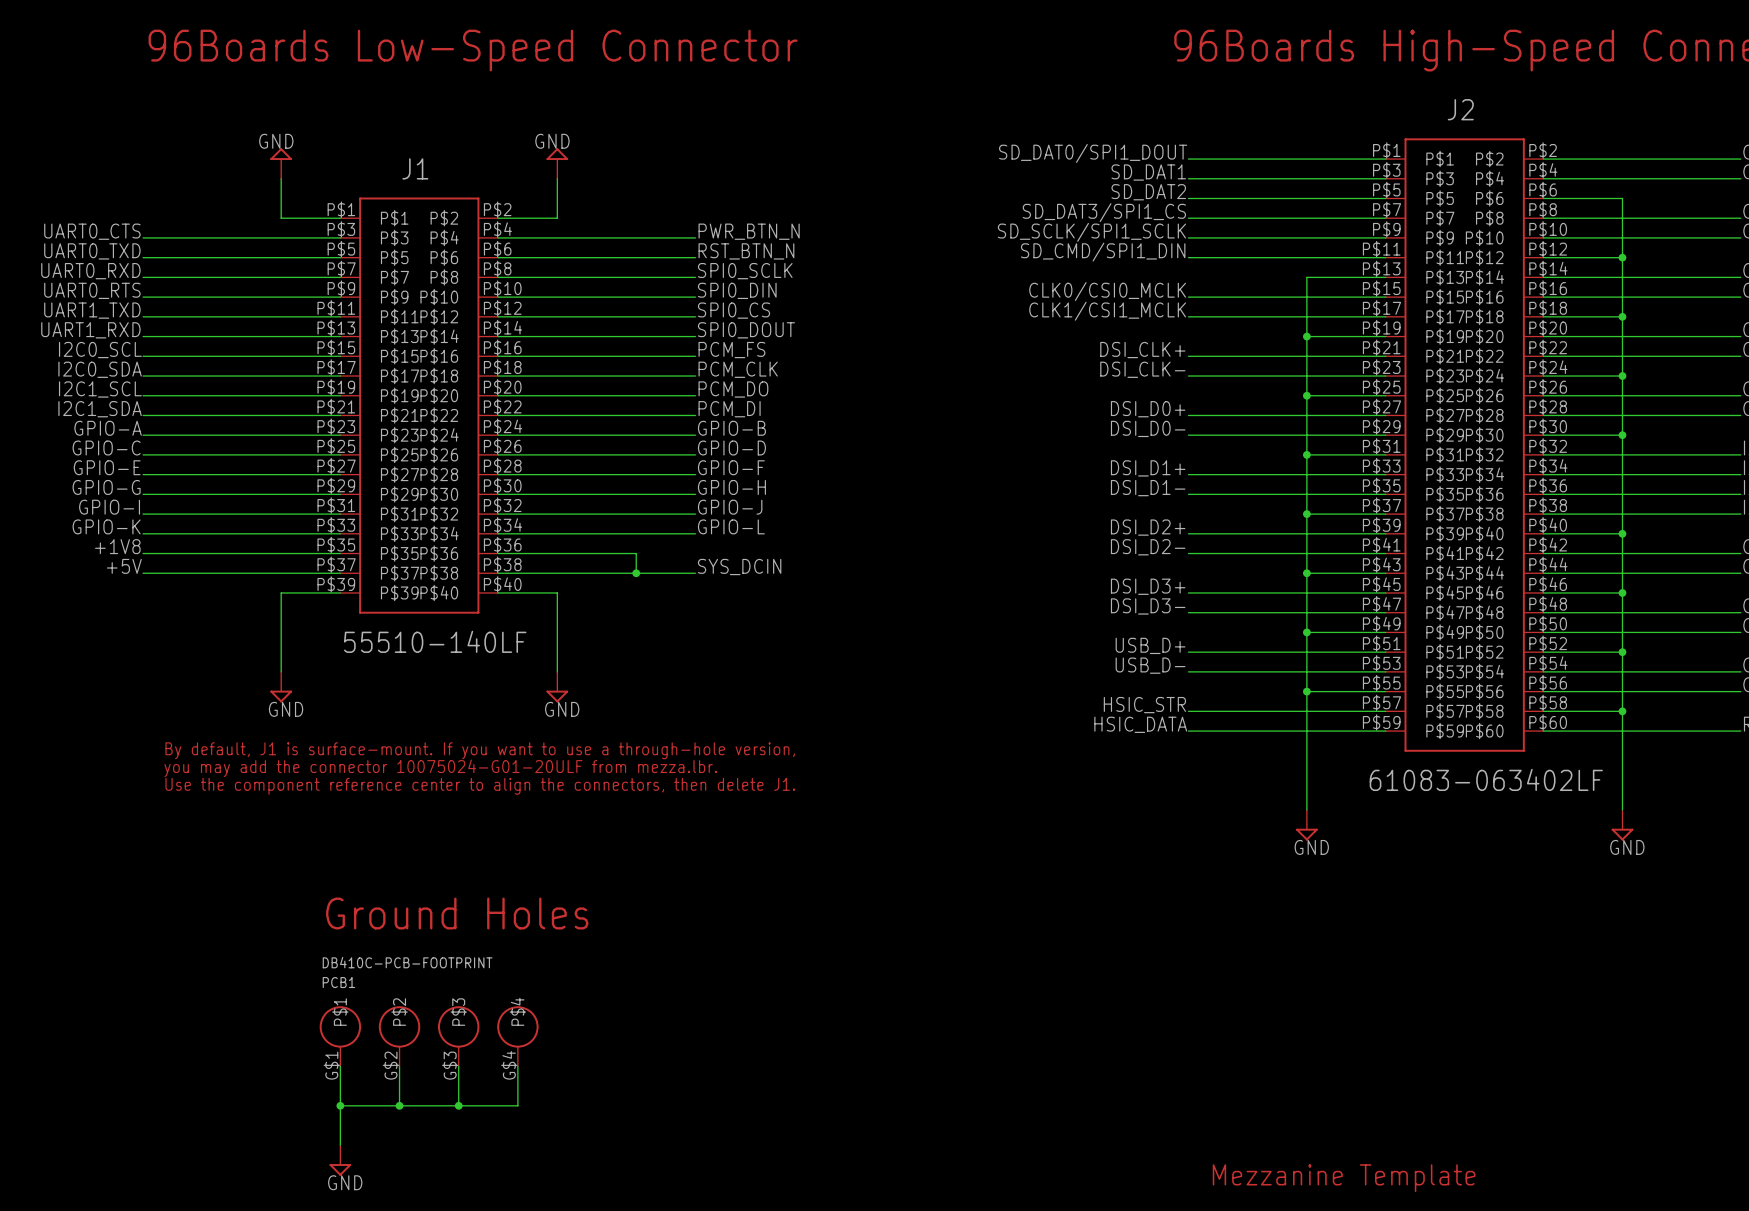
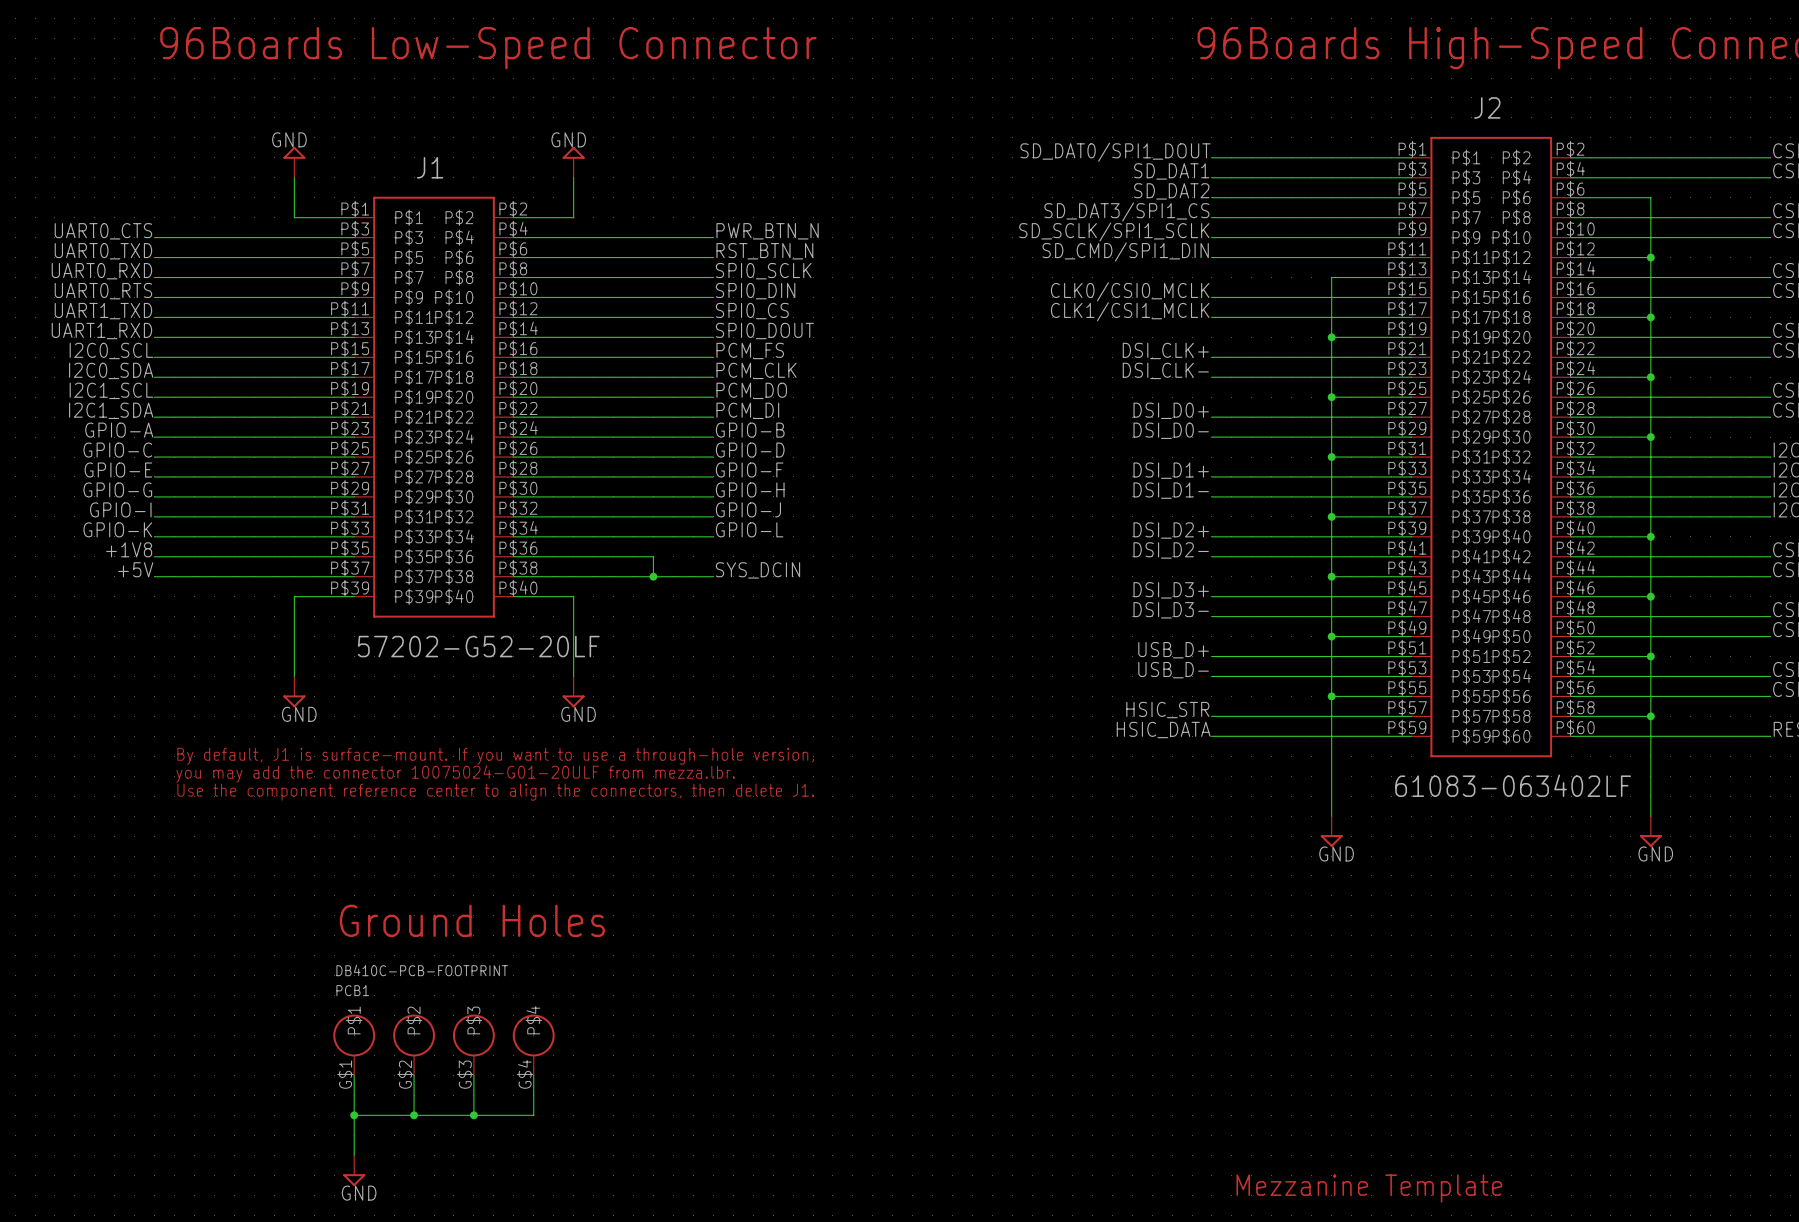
J1 value: 55510-140LF (435, 641) -> 57202-G52-20LF (478, 646)

